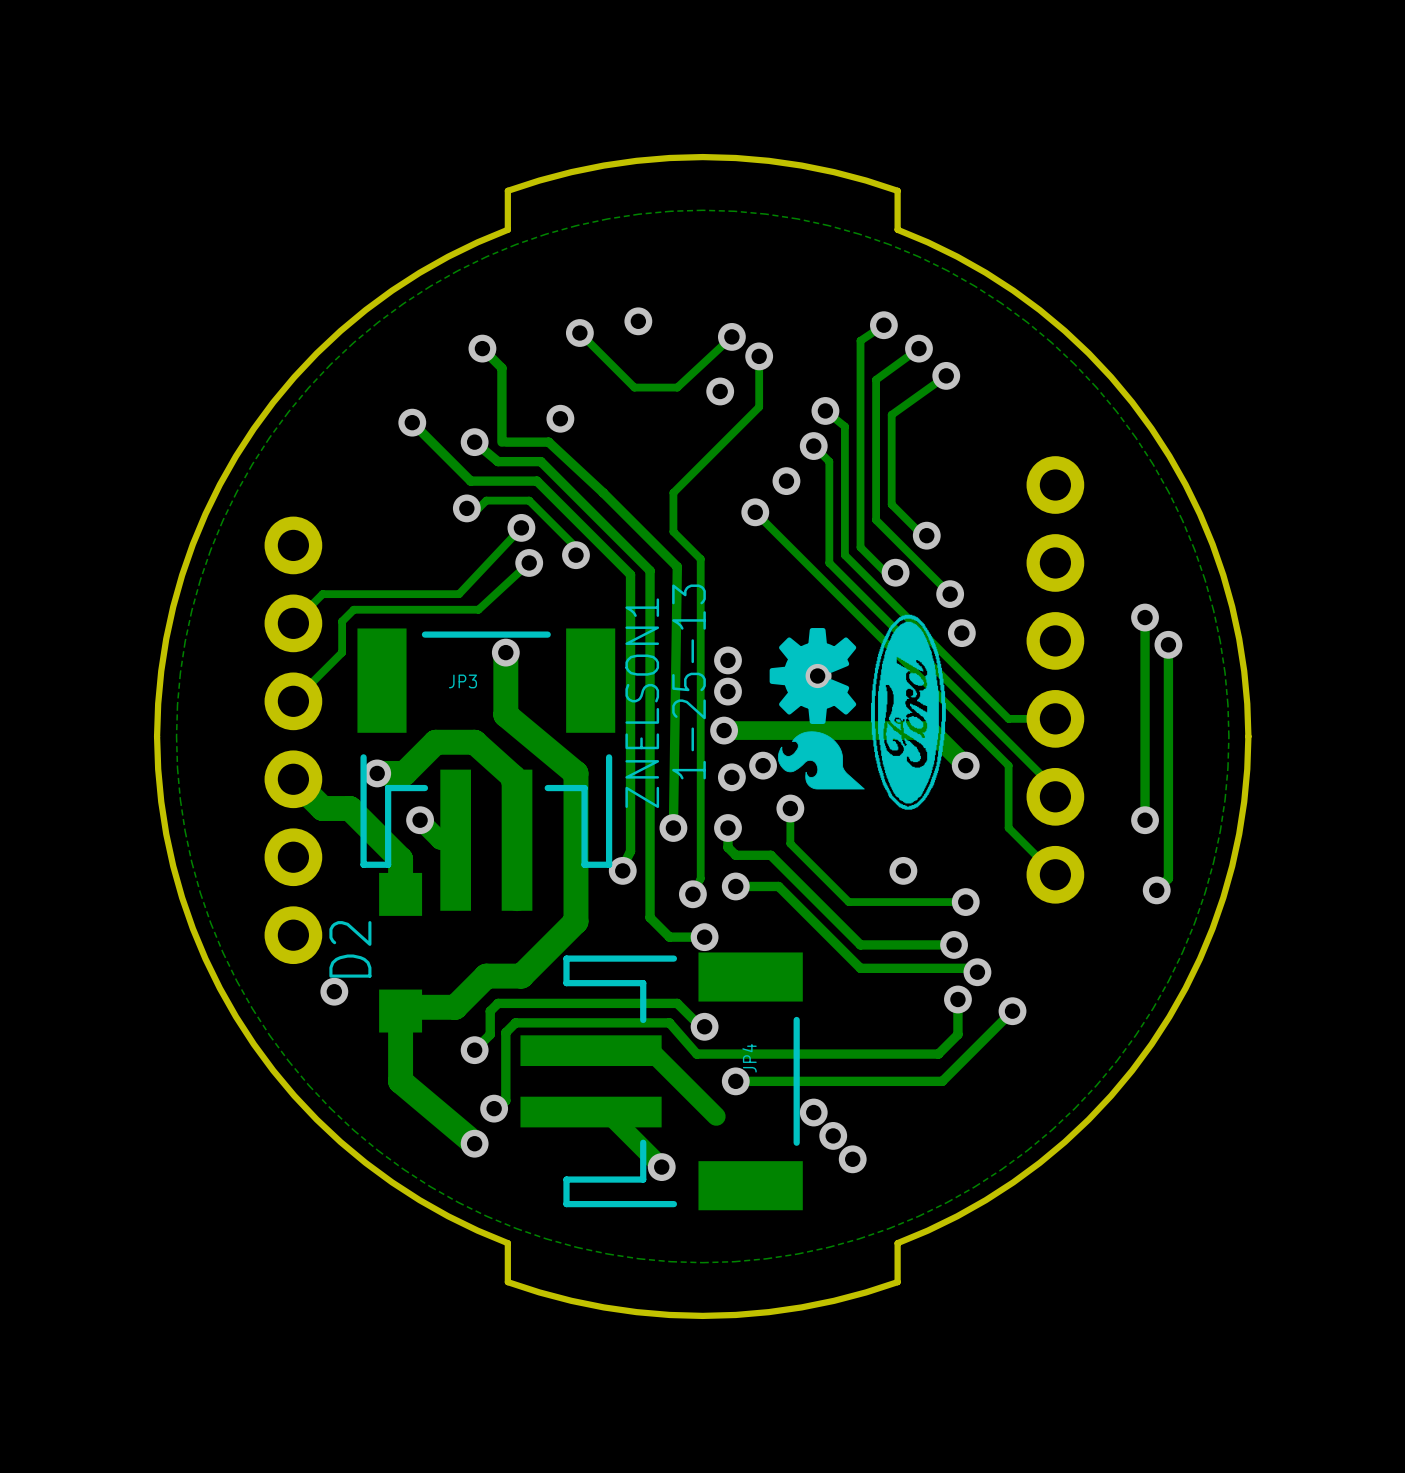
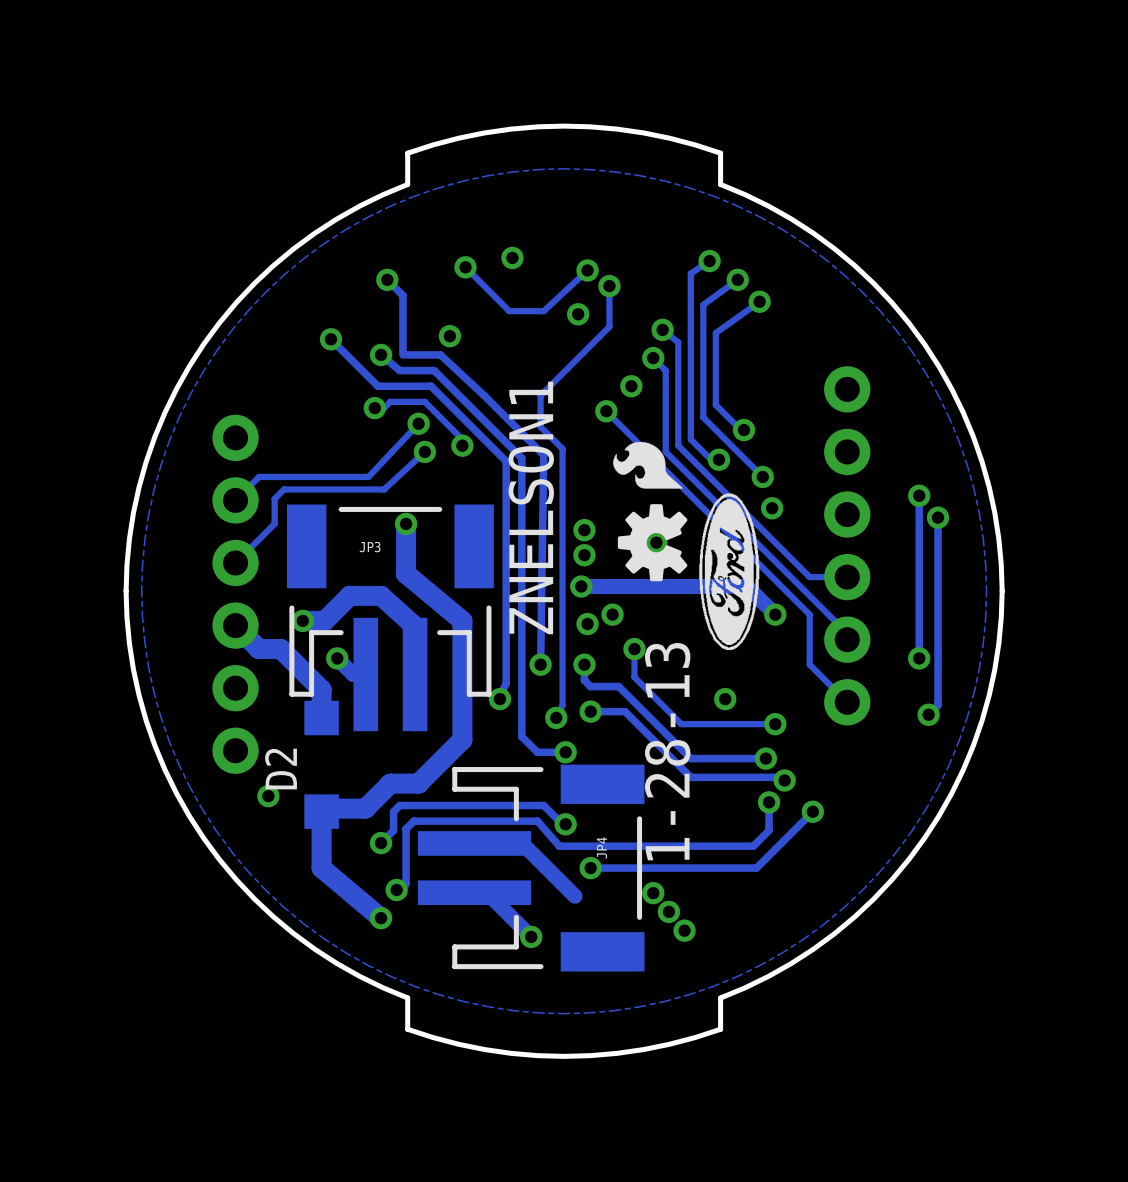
text: 1-25-13 (689, 681) -> ZNELSON1 (531, 507)
text: ZNELSON1 (642, 703) -> none
drawing position: (821, 760) -> (648, 465)
text: none -> 1-28-13 (667, 751)

